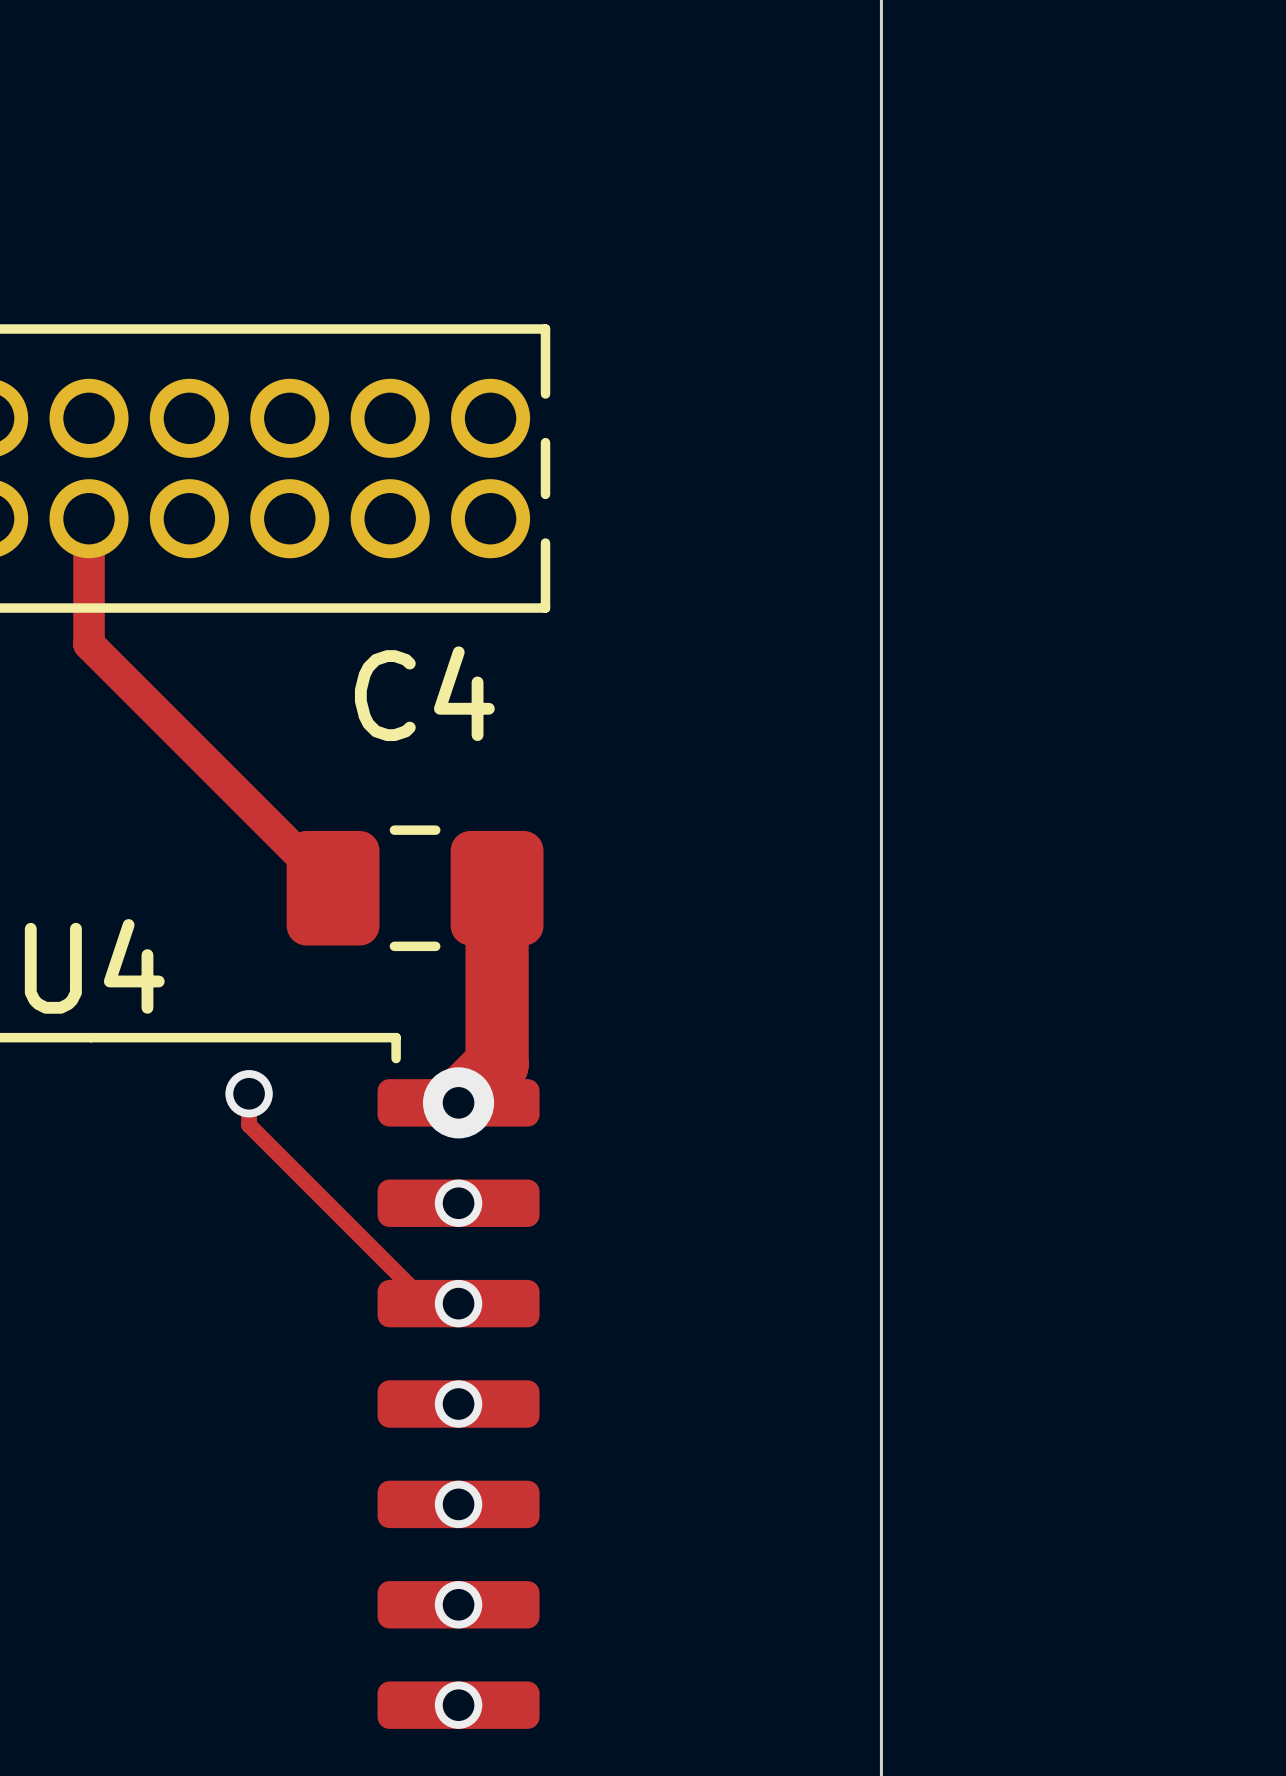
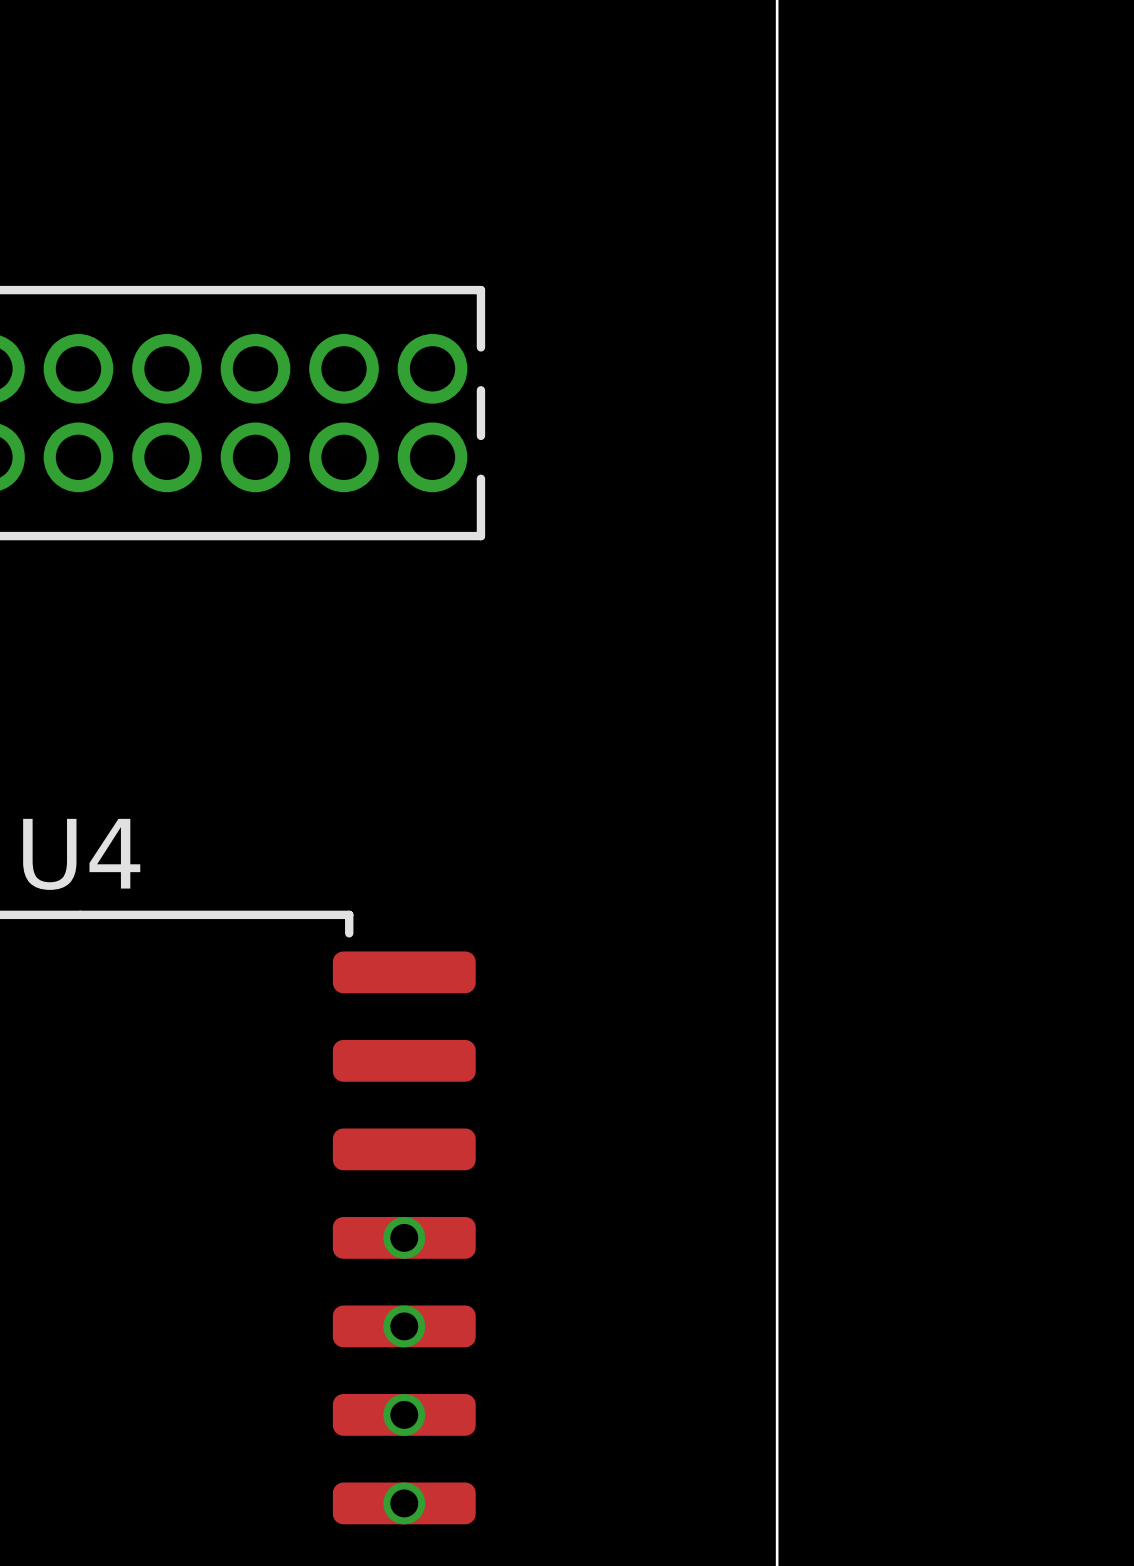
track: (89, 518) (89, 644) (333, 888) -> none
C4: (415, 888) -> none
track: (497, 888) (497, 1064) (458, 1102) -> none
track: (249, 1093) (249, 1125) (427, 1303) (458, 1303) -> none
via: (249, 1093) -> none
via: (458, 1102) -> none
via: (458, 1203) -> none
via: (458, 1303) -> none

